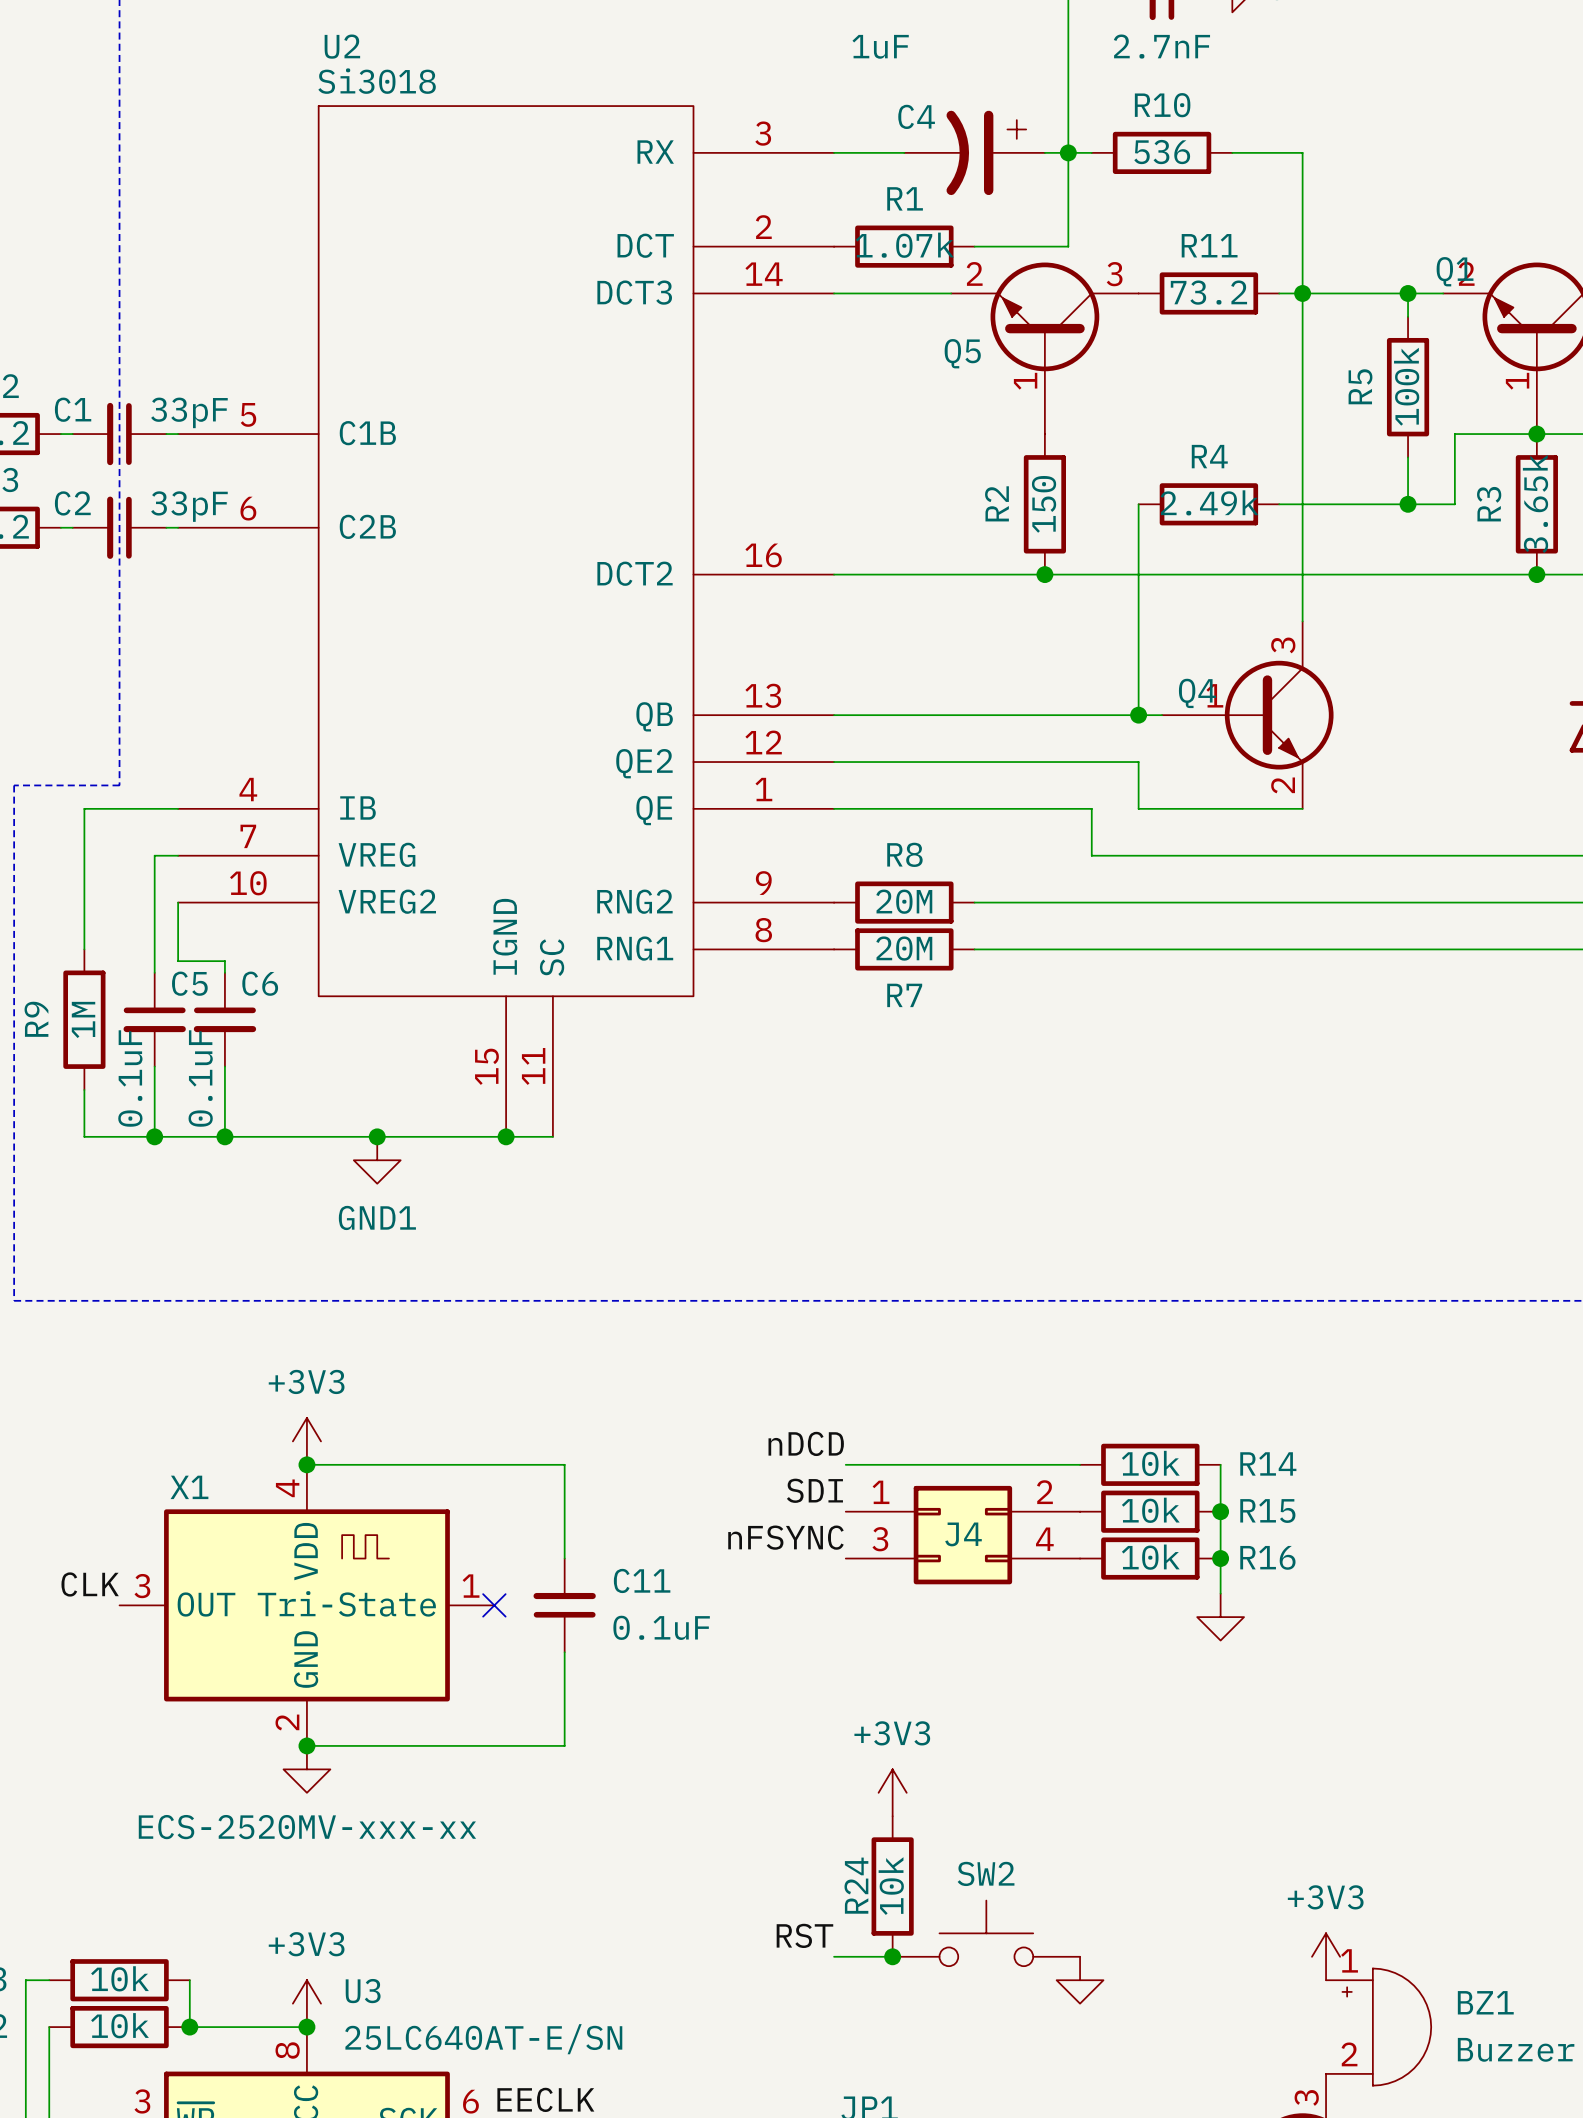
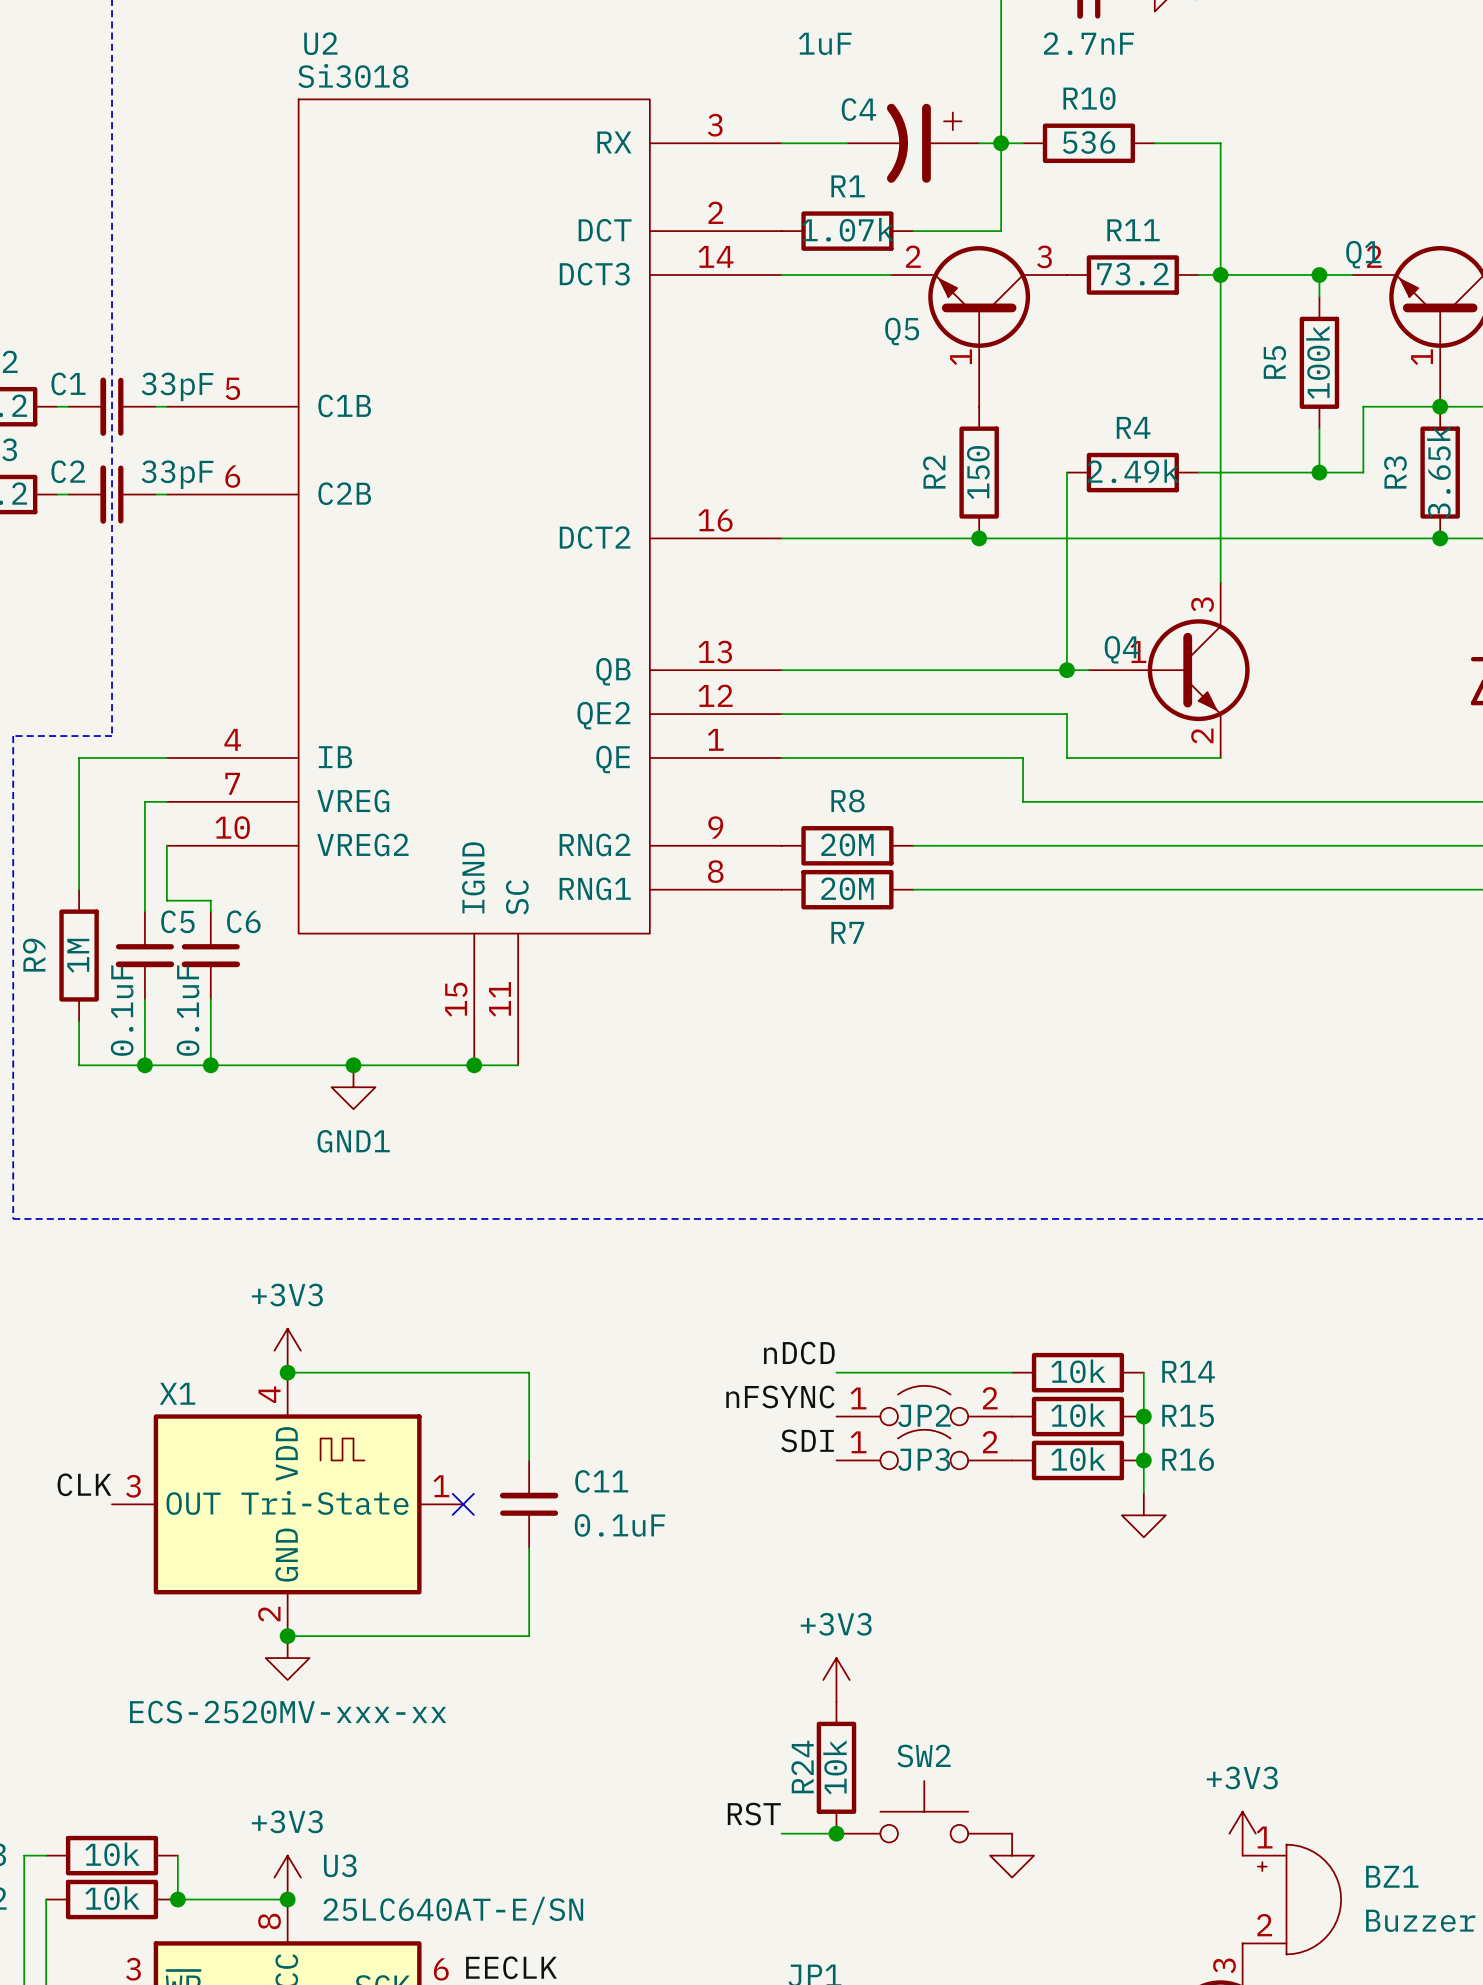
label position: nDCD (806, 1443) -> nDCD (799, 1353)
wire: (845, 1464) (892, 1464) -> none
label position: SDI (814, 1490) -> SDI (807, 1440)
JP2: none -> (924, 1405)
J4: (962, 1535) -> none
label position: nFSYNC (785, 1537) -> nFSYNC (780, 1396)
JP3: none -> (924, 1449)

